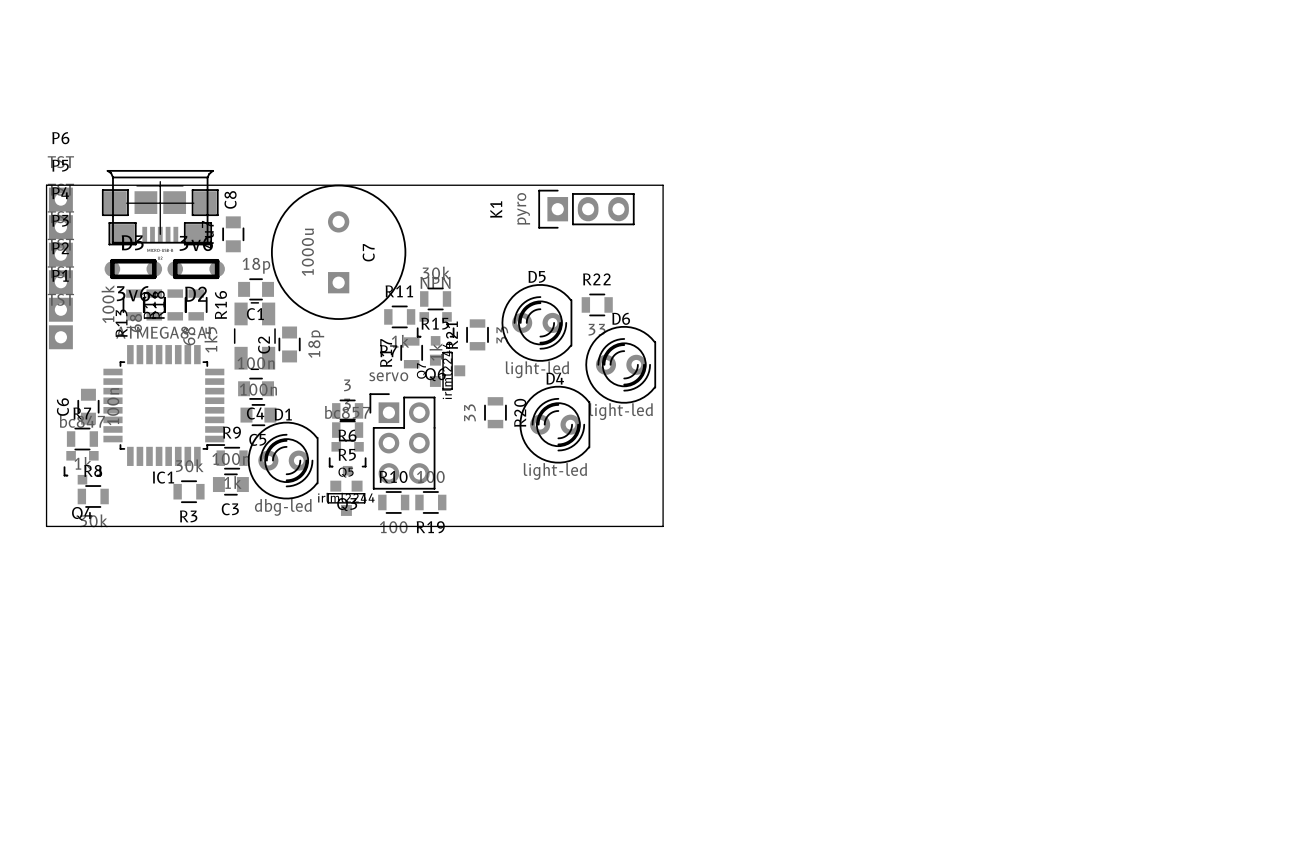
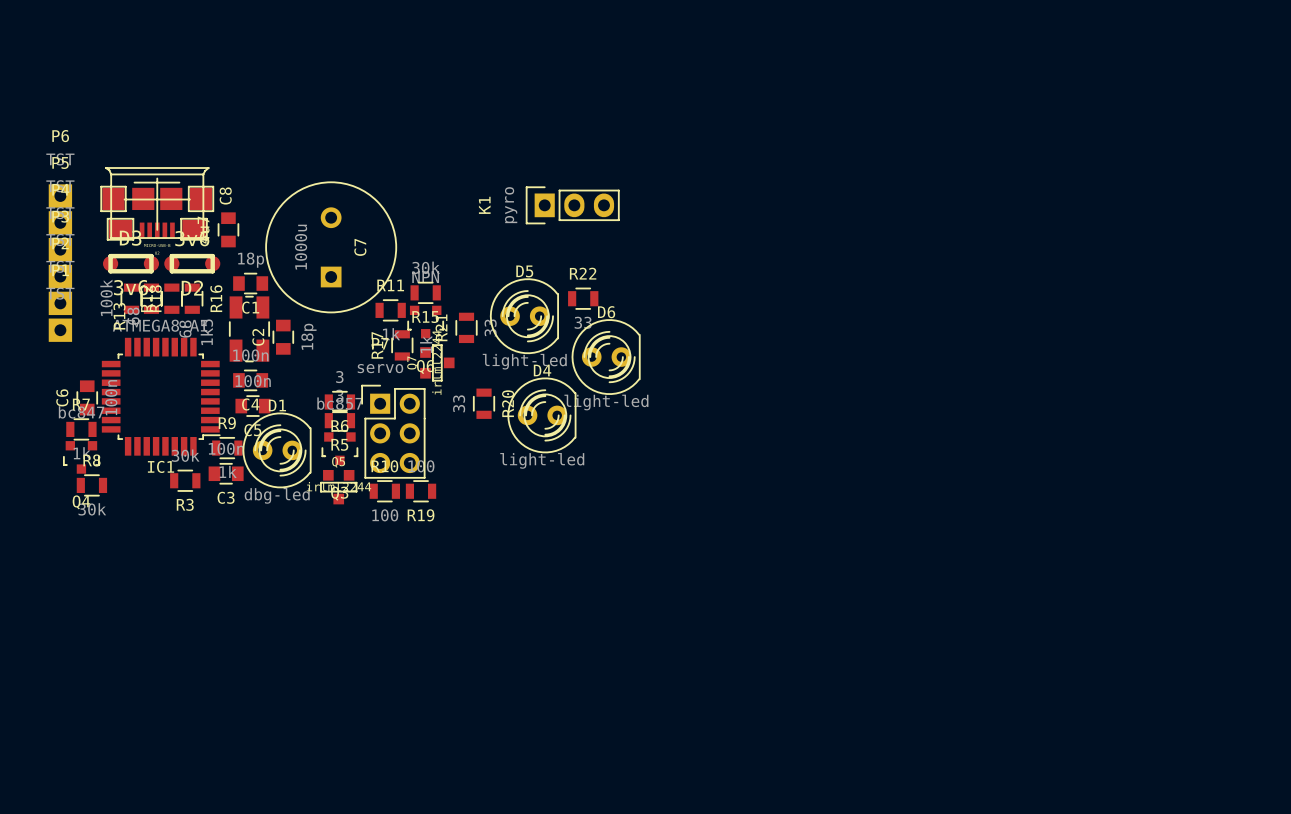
board edge: (46, 185) (46, 526) (663, 526) (663, 185) (46, 185) -> none

